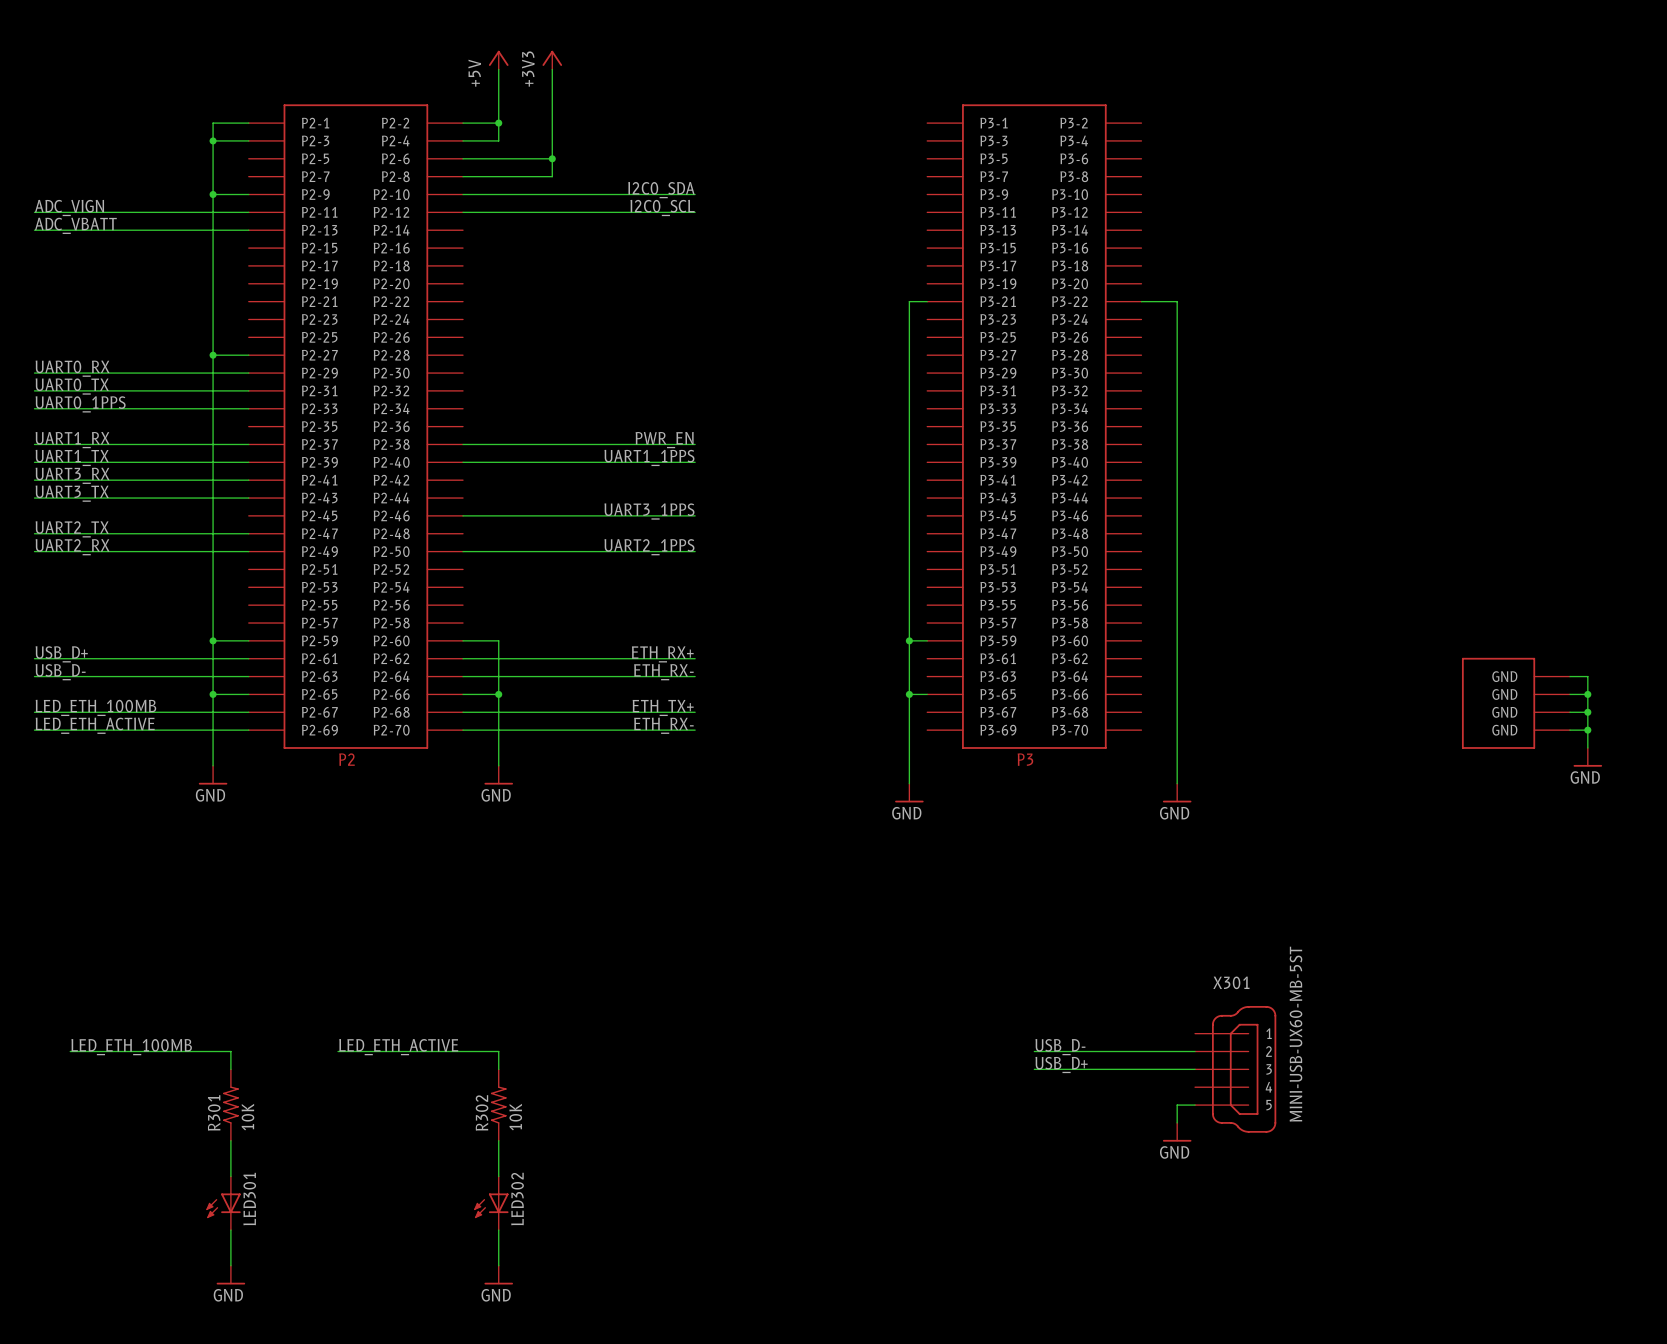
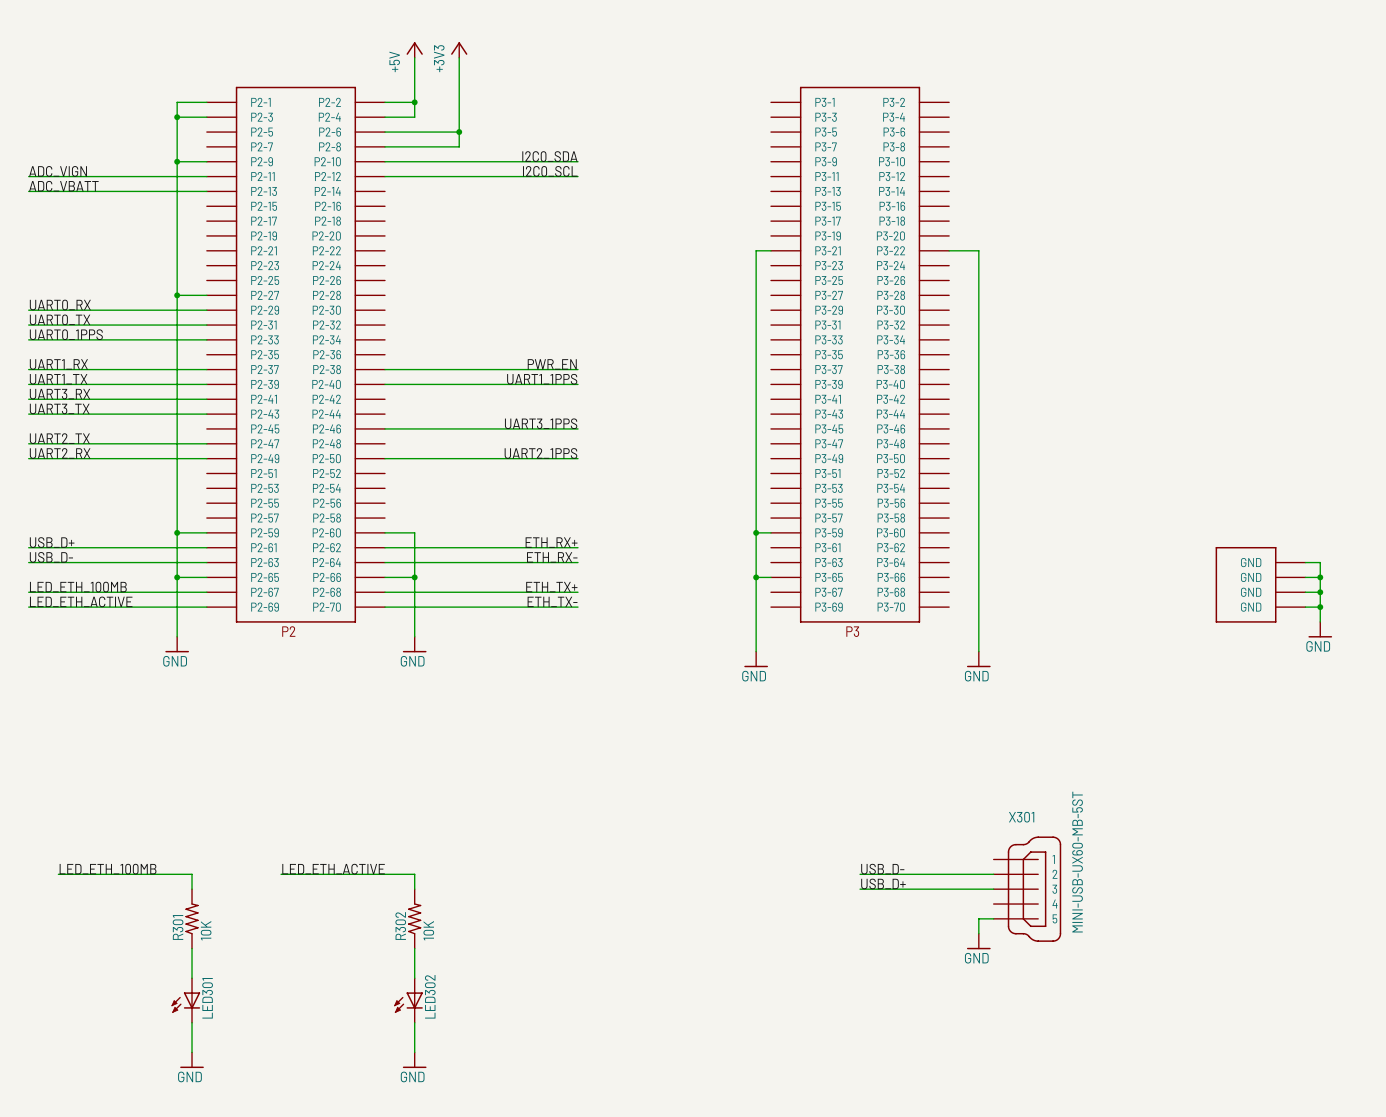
label: ETH_RX- (663, 725) -> ETH_TX- (552, 601)

